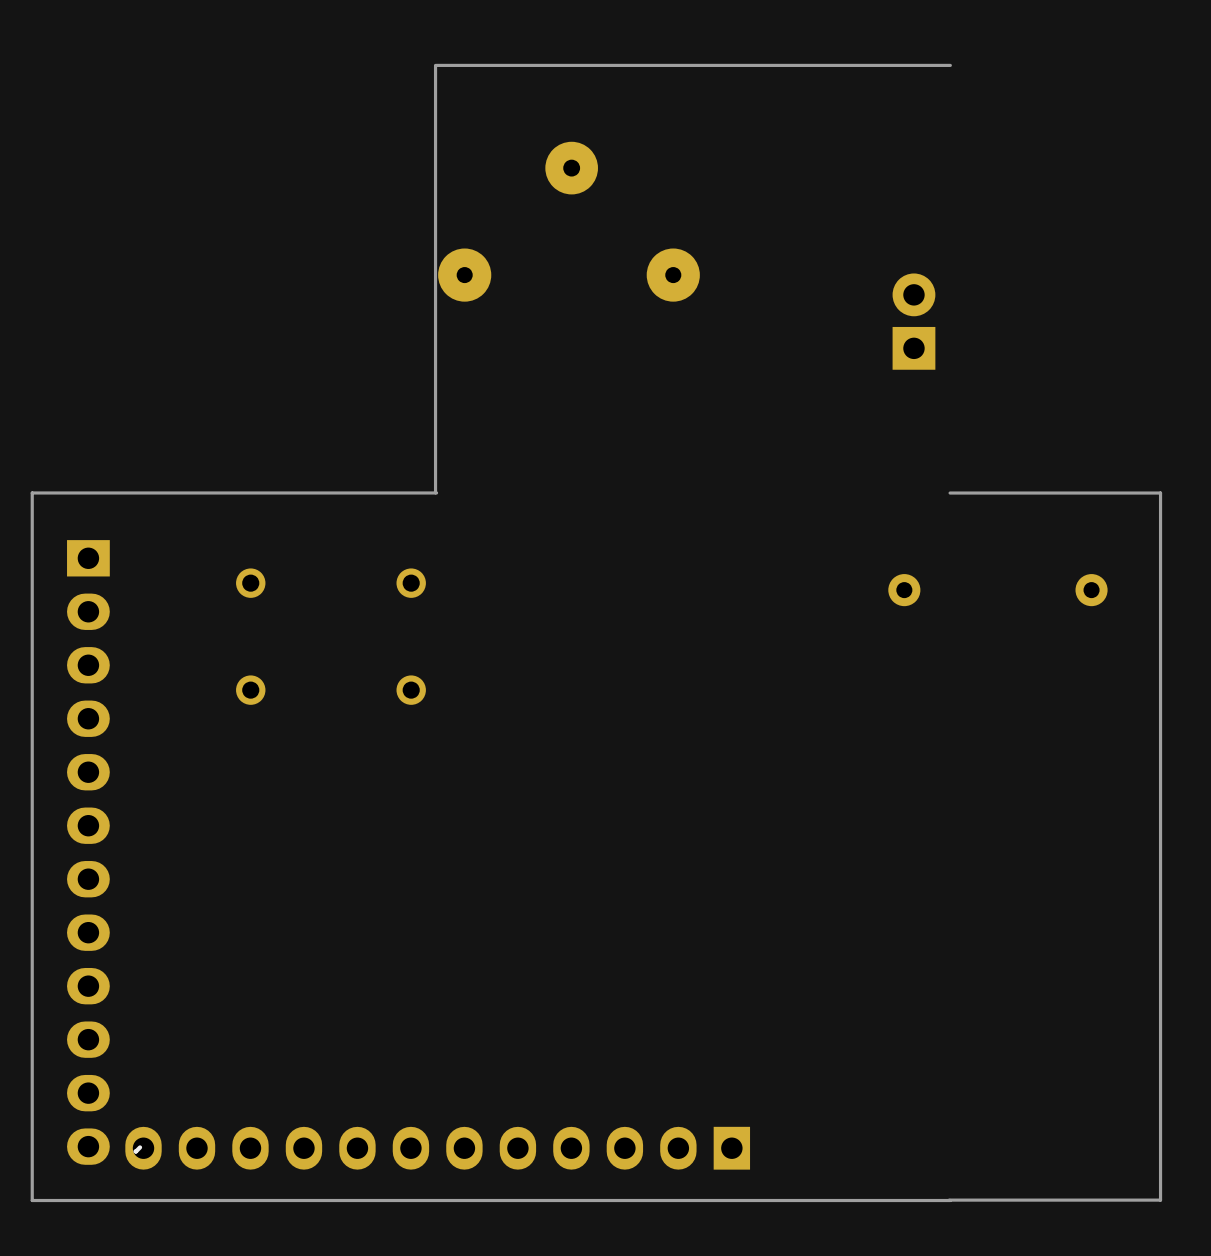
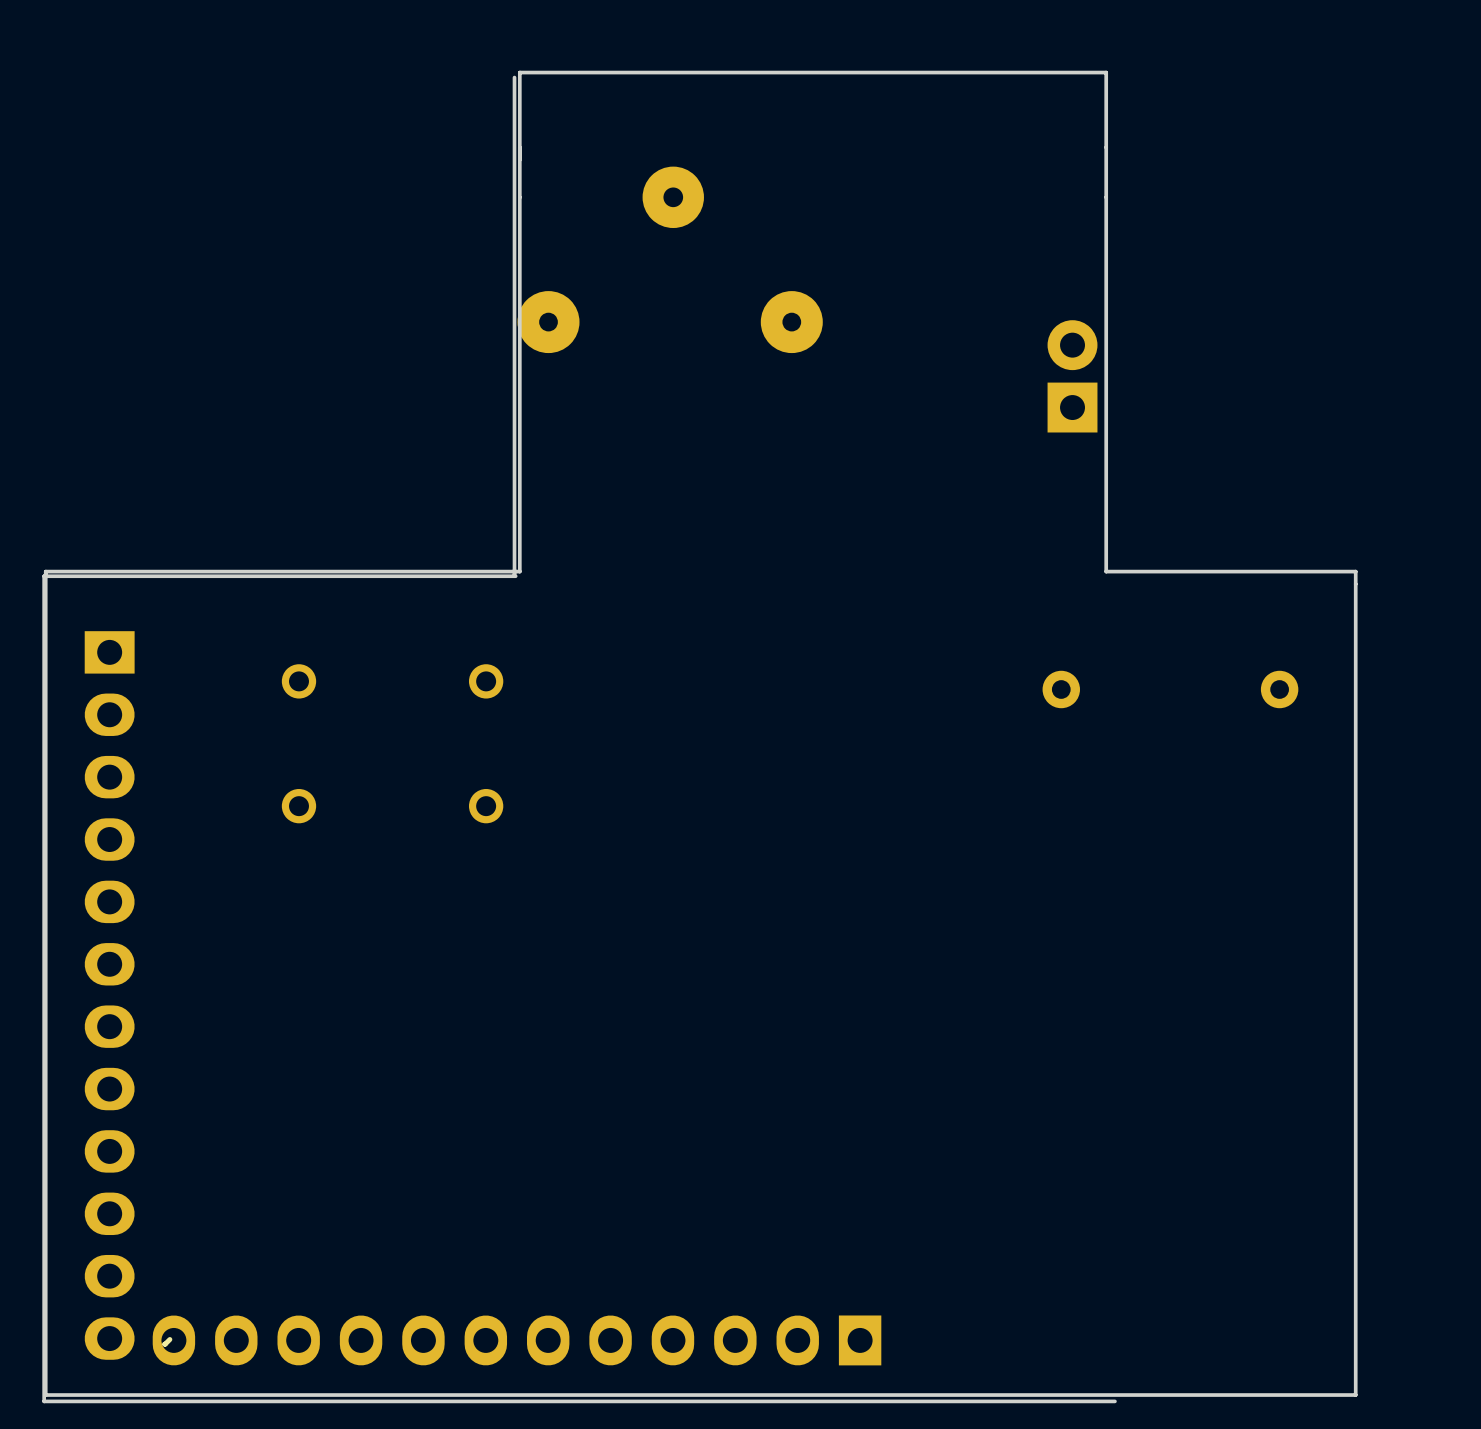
board edge: none -> (1106, 72) (1106, 571) (1355, 571) (1355, 1395) (45, 1395) (45, 571) (519, 571) (519, 72) (1106, 72)
board edge: (950, 65) (436, 65) -> none
board edge: (950, 493) (1160, 493) (1160, 1200) (949, 1200) -> none

